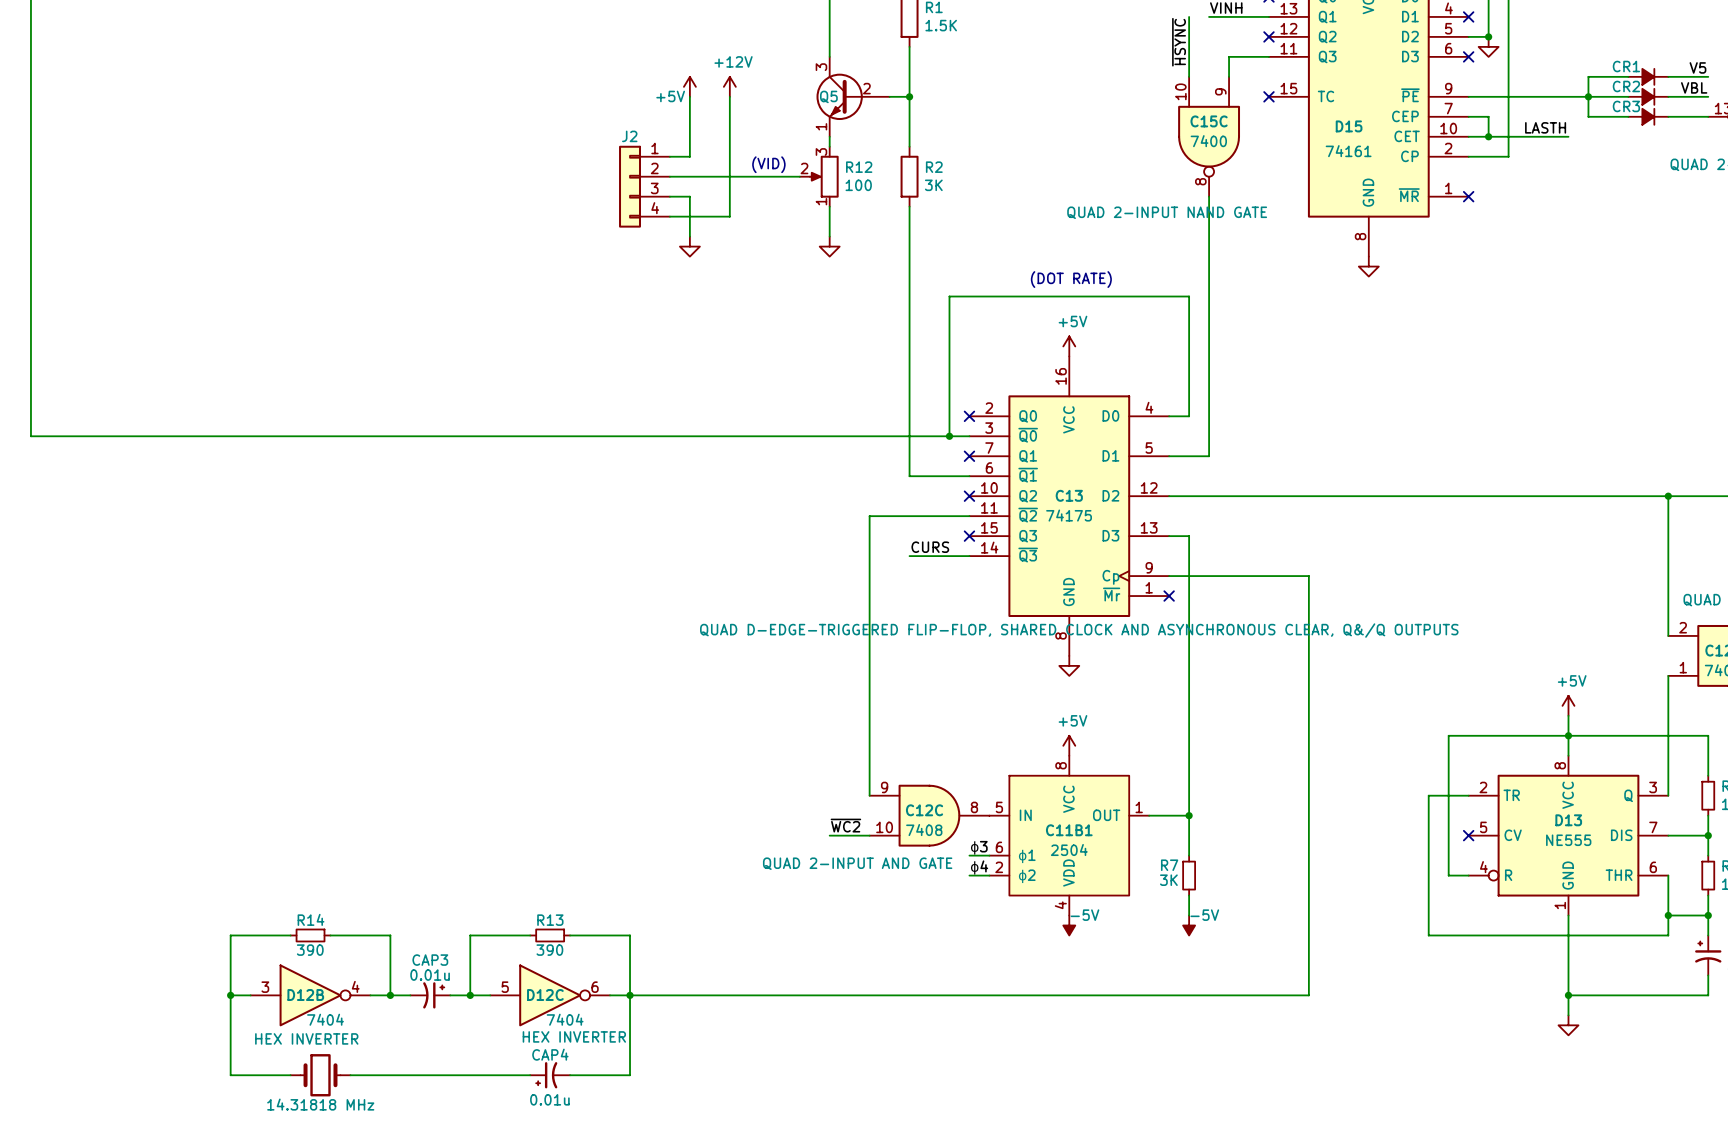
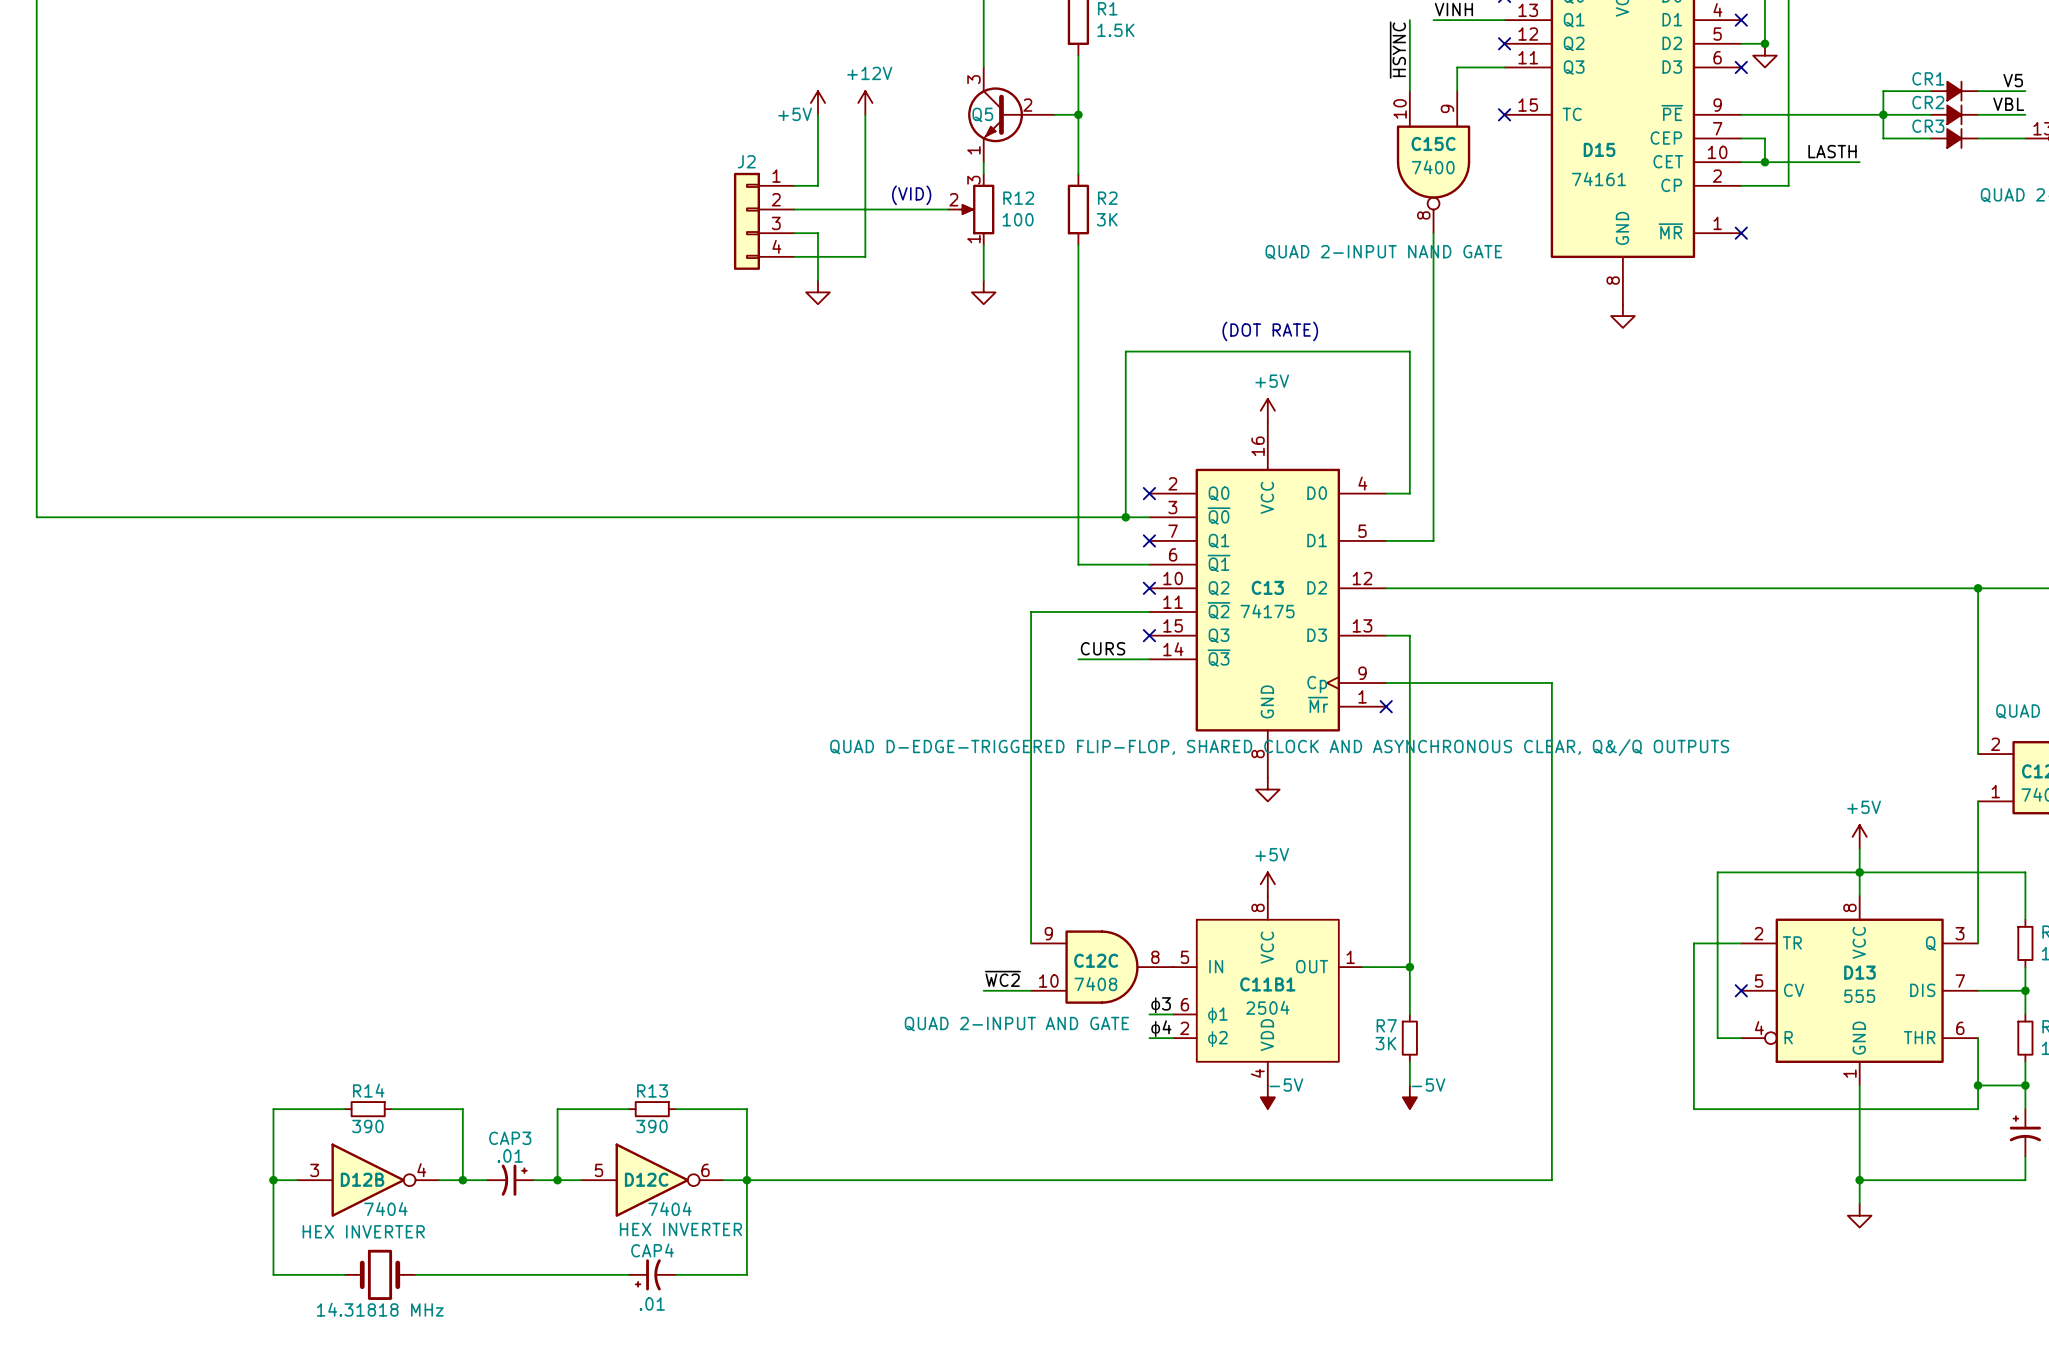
D13 value: NE555 (1568, 840) -> 555 (1859, 996)
CAP3 value: 0.01u (430, 975) -> .01 (510, 1156)
CAP4 value: 0.01u (549, 1099) -> .01 (652, 1304)

